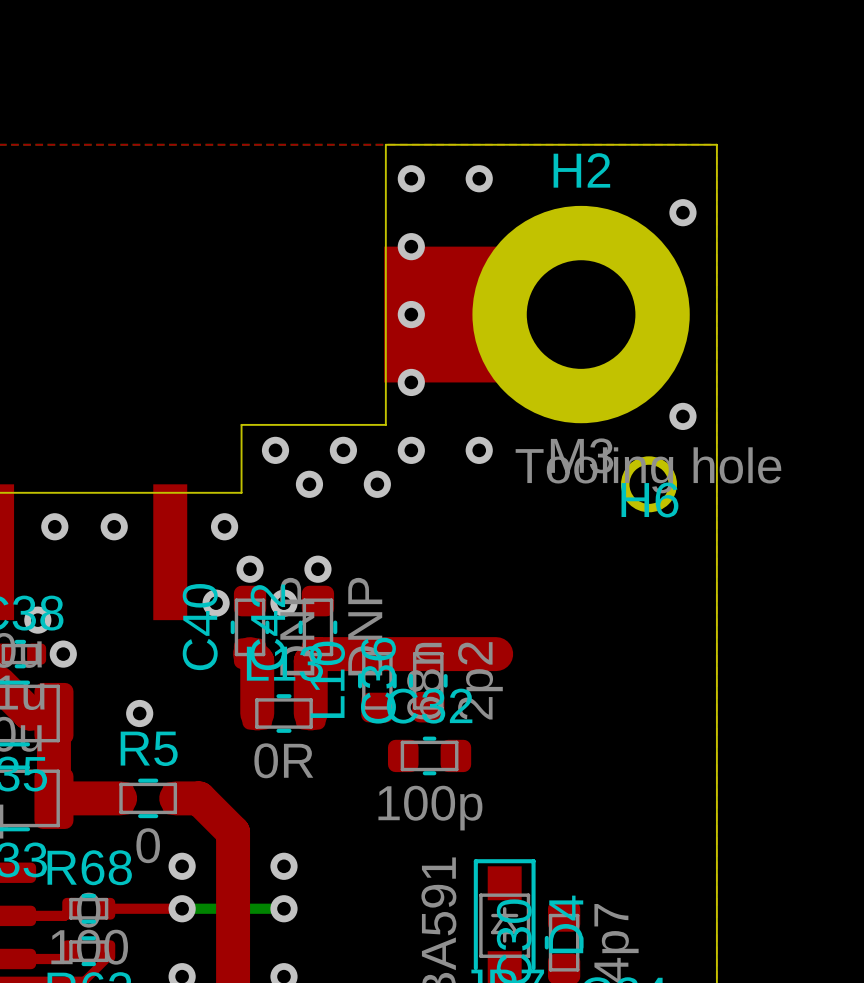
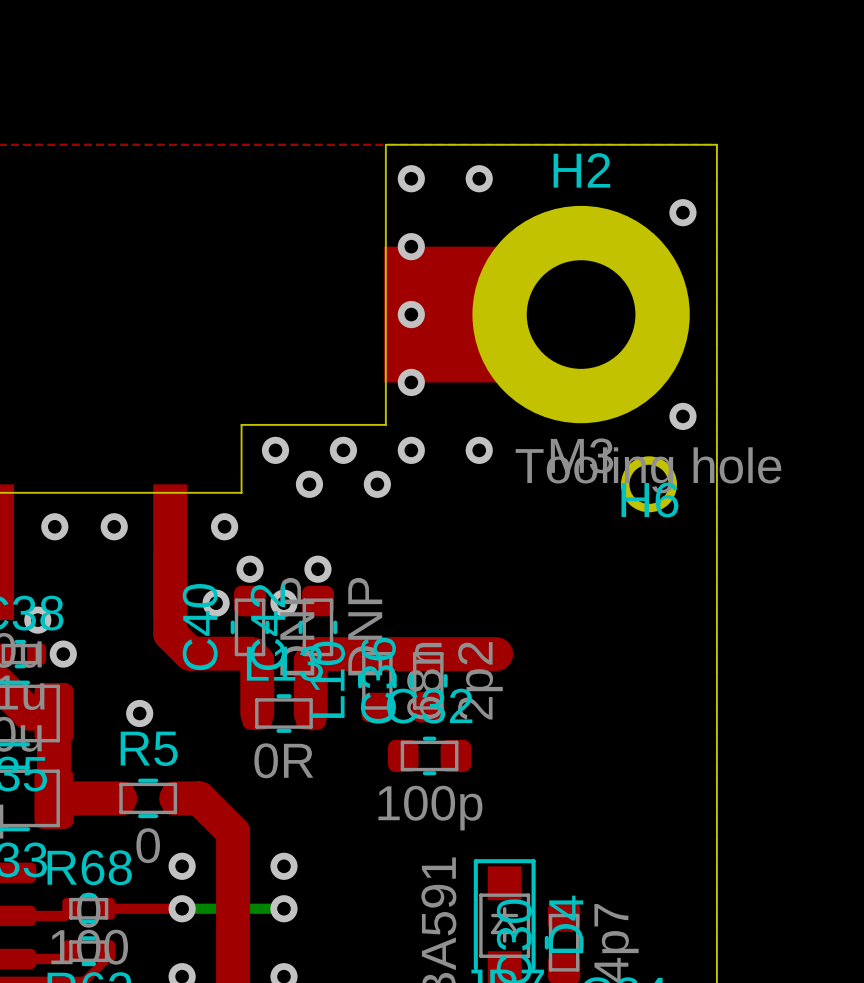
top track: none -> (170, 552) (170, 633) (190, 653) (250, 653)

